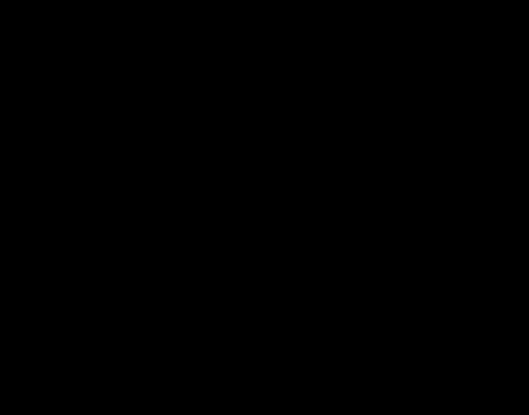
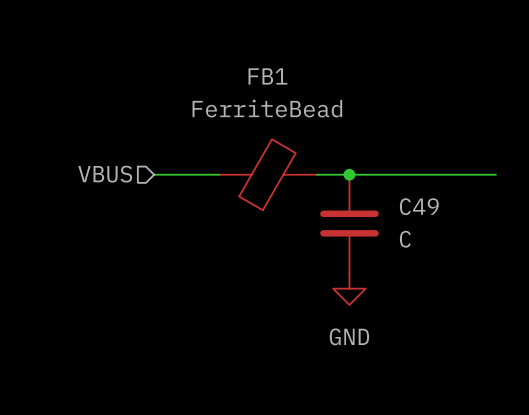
hierarchical label: none -> VBUS (105, 174)
wire: none -> (154, 174) (219, 174)
FB1: none -> FerriteBead (268, 174)
wire: none -> (316, 174) (495, 174)
junction: none -> (349, 174)
C49: none -> C (349, 223)
power symbol: none -> GND (349, 288)

